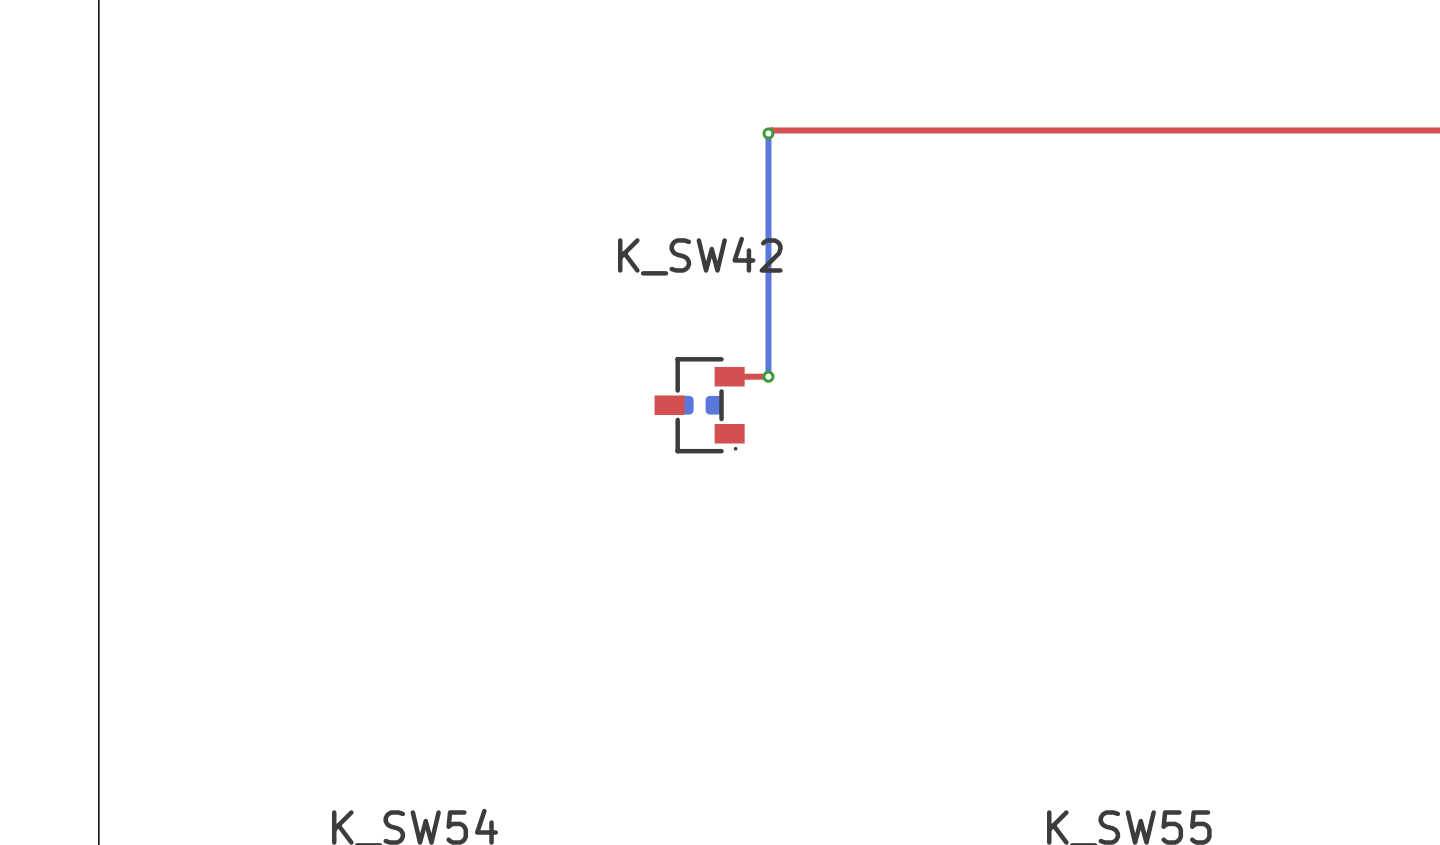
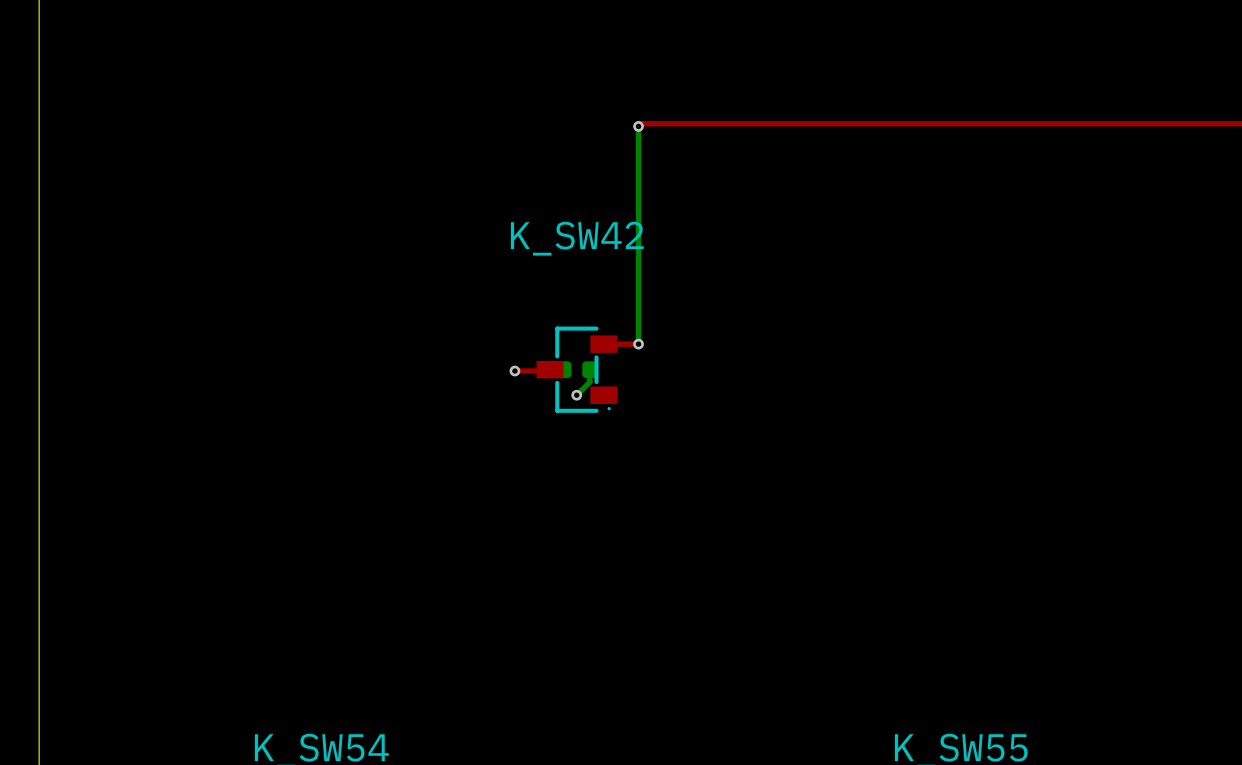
top track: none -> (550, 369) (514, 371)
bottom track: none -> (589, 369) (589, 382) (576, 395)
via: none -> (514, 371)
via: none -> (576, 395)

